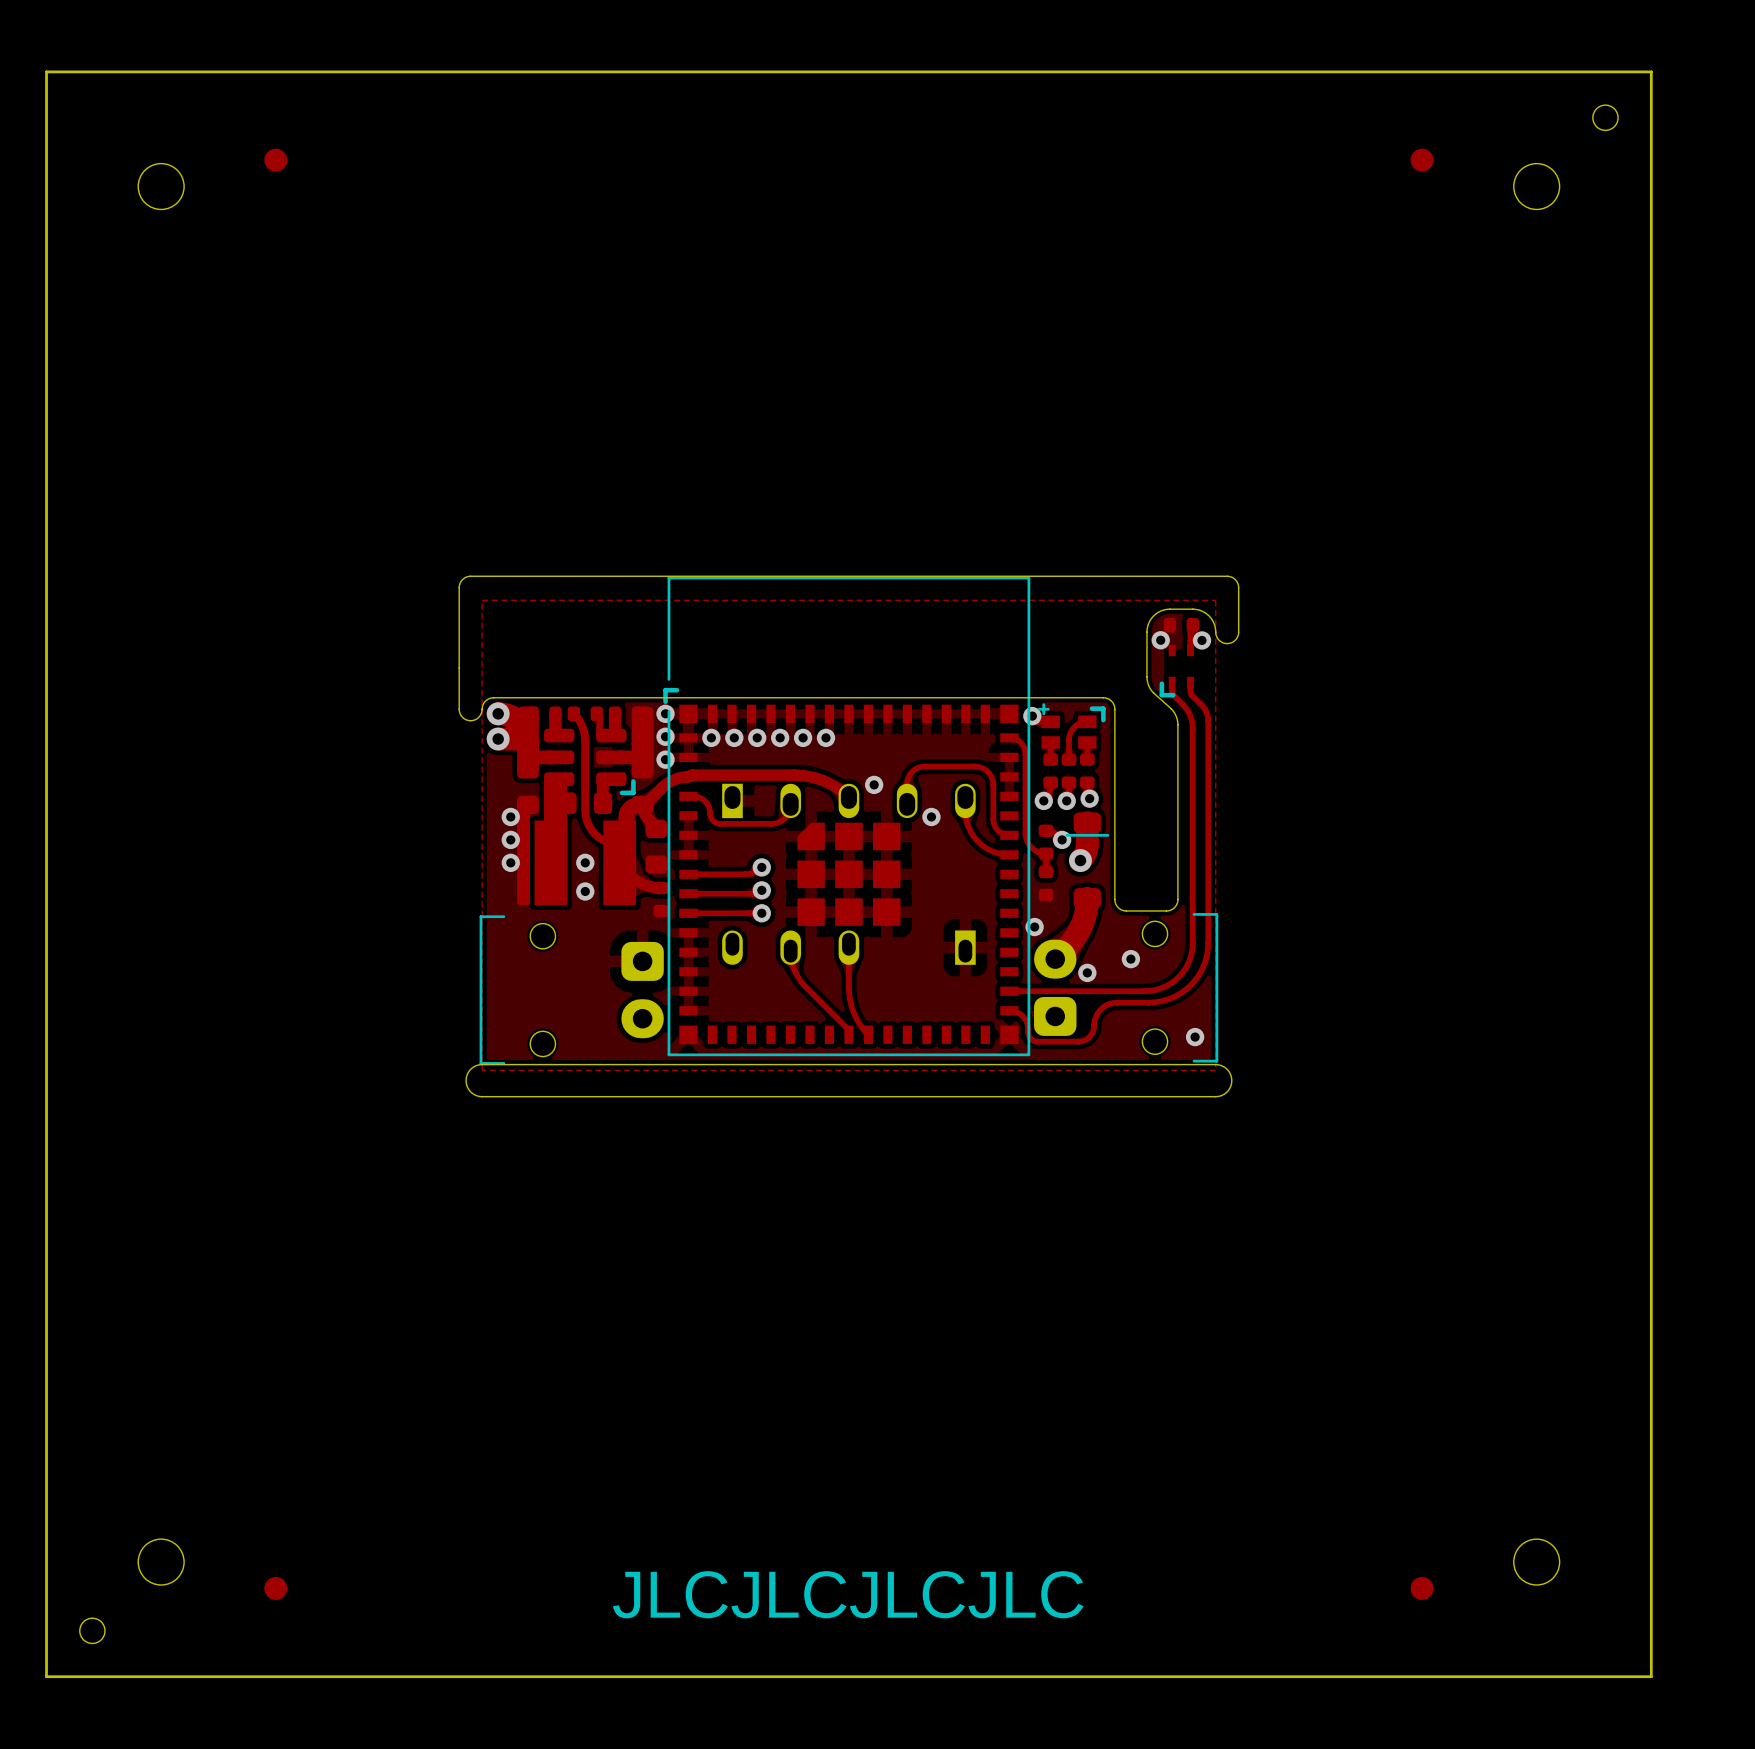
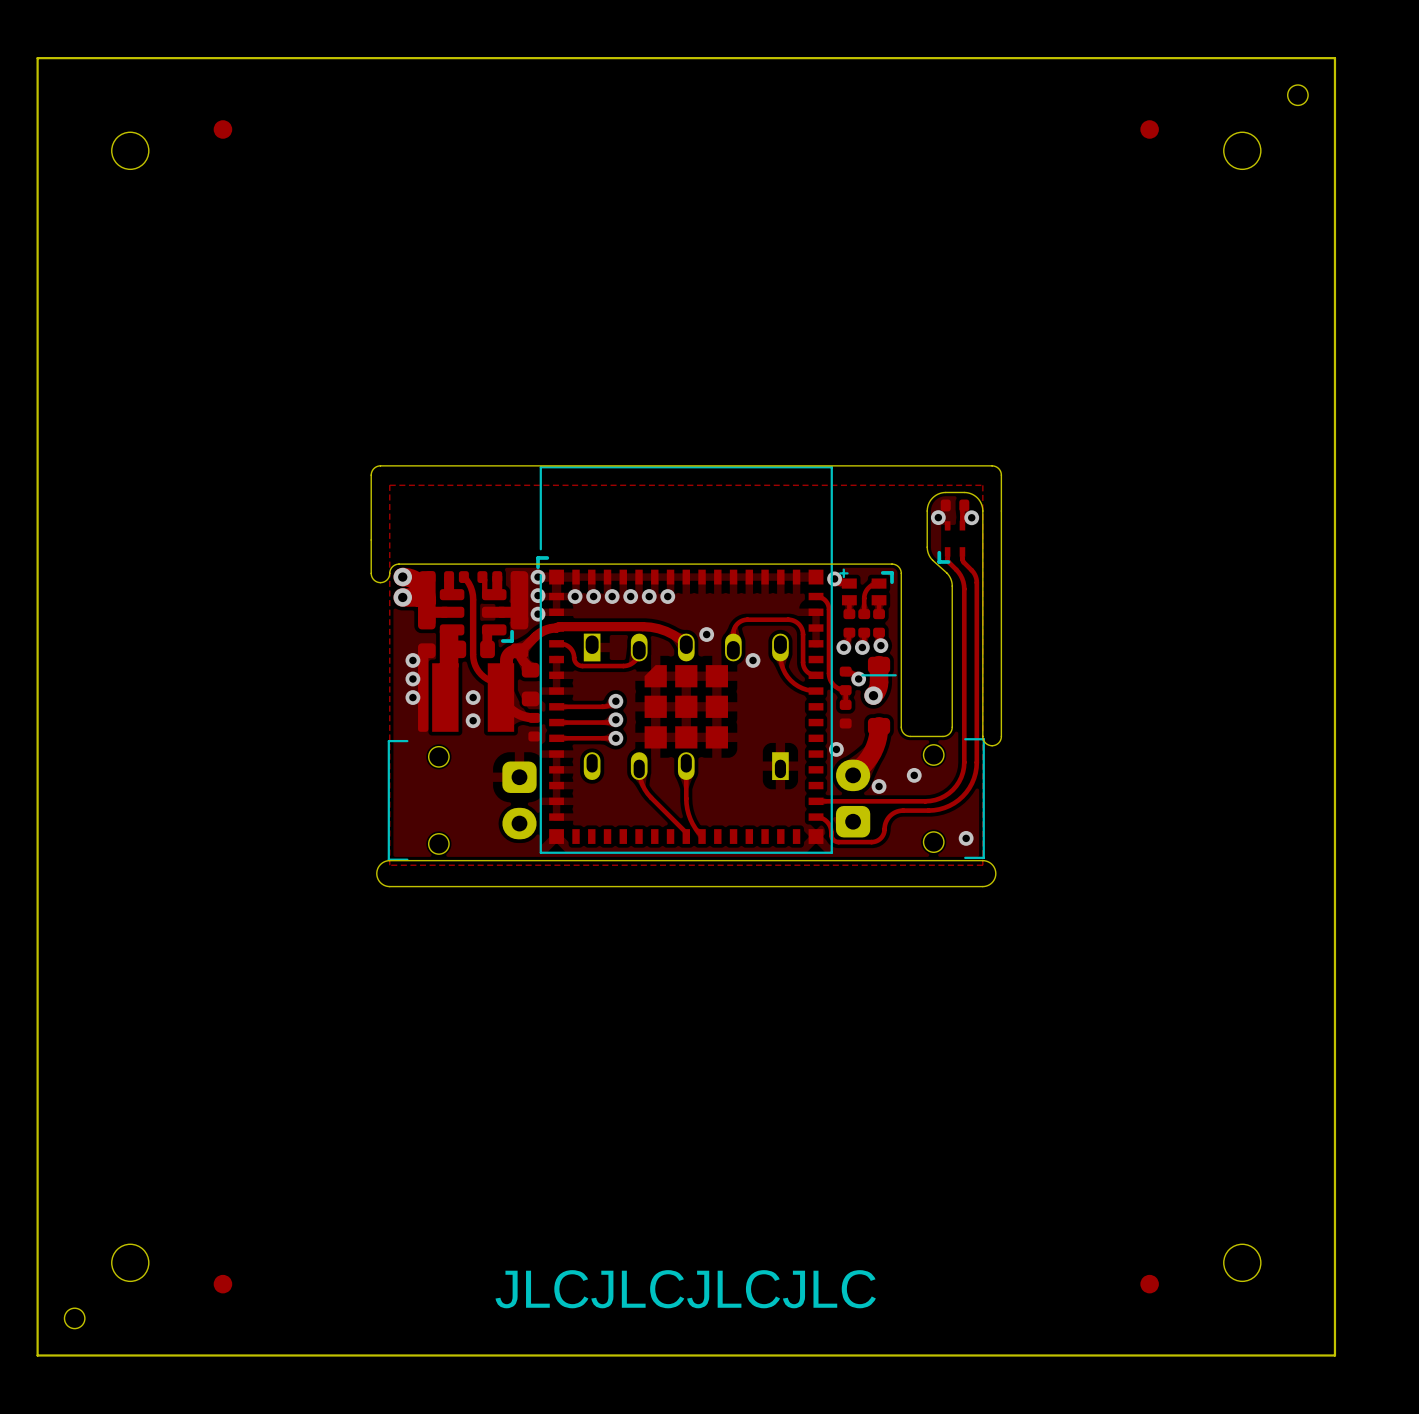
board edge: (1215, 632) (1219, 640) (1227, 643) (1235, 640) (1238, 632) -> (982, 511) (982, 736) (985, 743) (992, 745) (998, 743) (1001, 736) (1001, 511)

